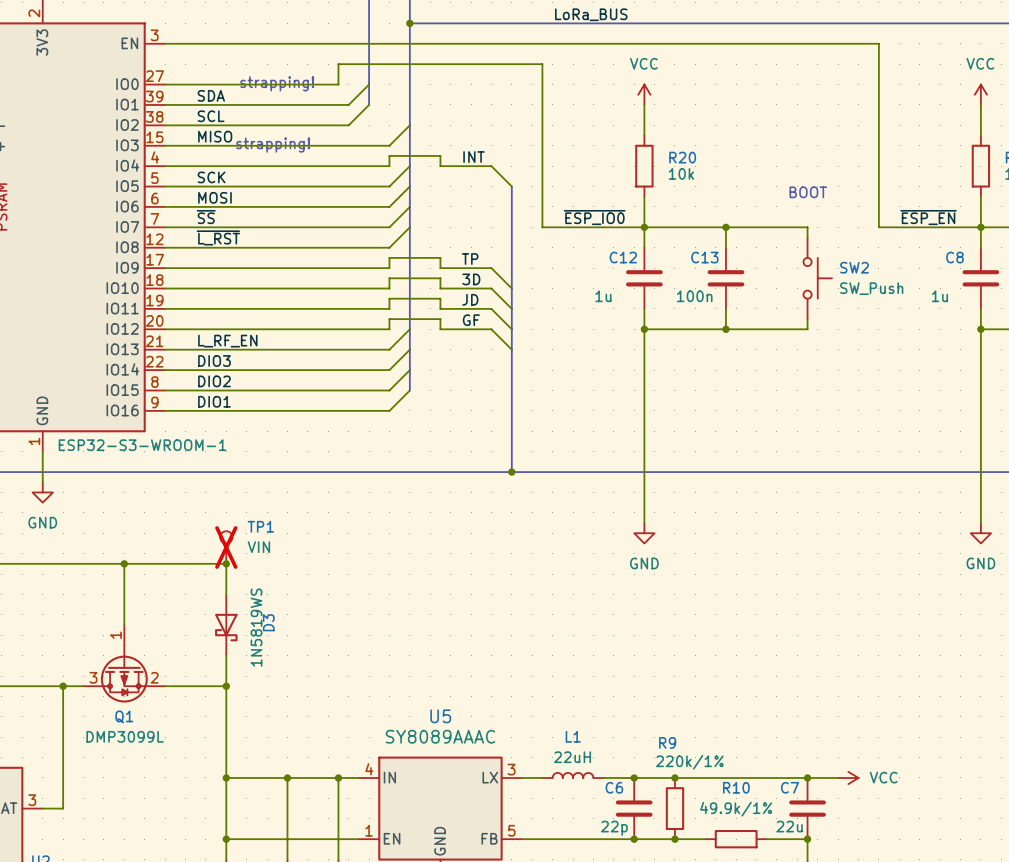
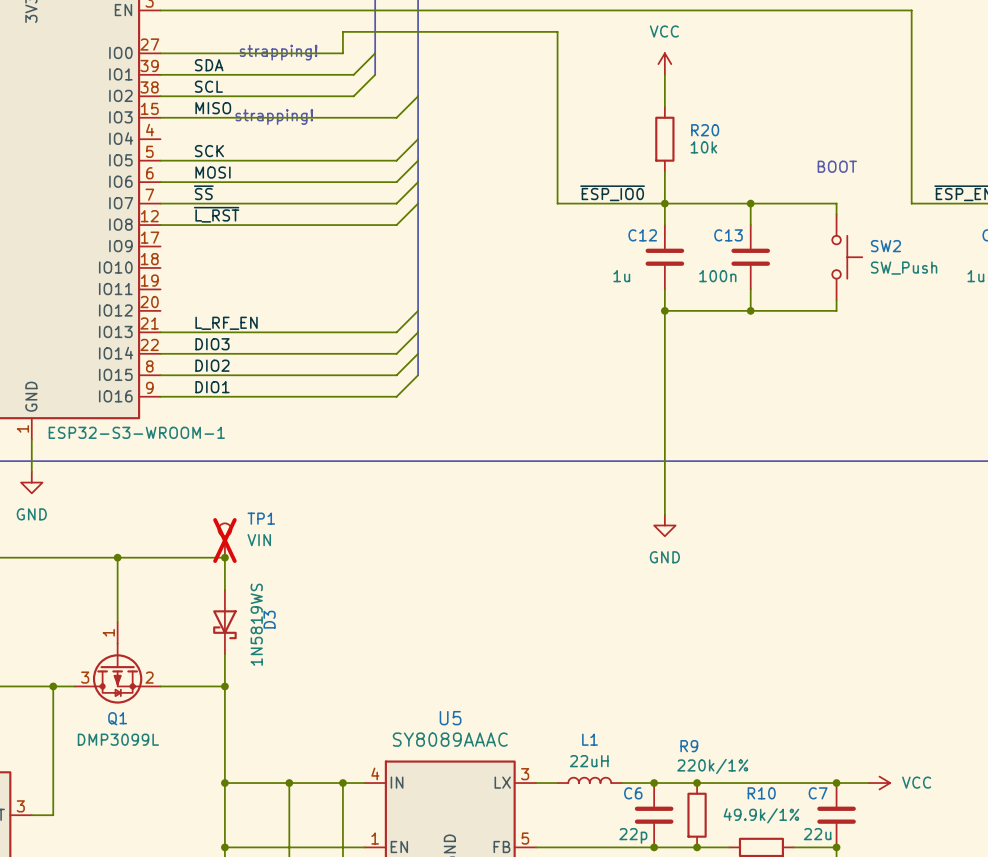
label: INT (474, 157) -> none
wire: (165, 166) (389, 166) (389, 155) (440, 155) (440, 166) (491, 166) (511, 186) -> none
bus: (511, 186) (511, 472) -> none
label: TP (470, 259) -> none
wire: (165, 268) (389, 268) (389, 257) (440, 257) (440, 268) (491, 268) (511, 288) -> none
label: 3D (471, 279) -> none
wire: (165, 288) (389, 288) (389, 278) (440, 278) (440, 288) (491, 288) (511, 308) -> none
label: JD (470, 299) -> none
wire: (165, 308) (389, 308) (389, 298) (440, 298) (440, 308) (491, 308) (511, 329) -> none
label: GF (471, 320) -> none
wire: (165, 329) (389, 329) (389, 319) (440, 319) (440, 329) (491, 329) (511, 349) -> none
junction: (511, 472) -> none

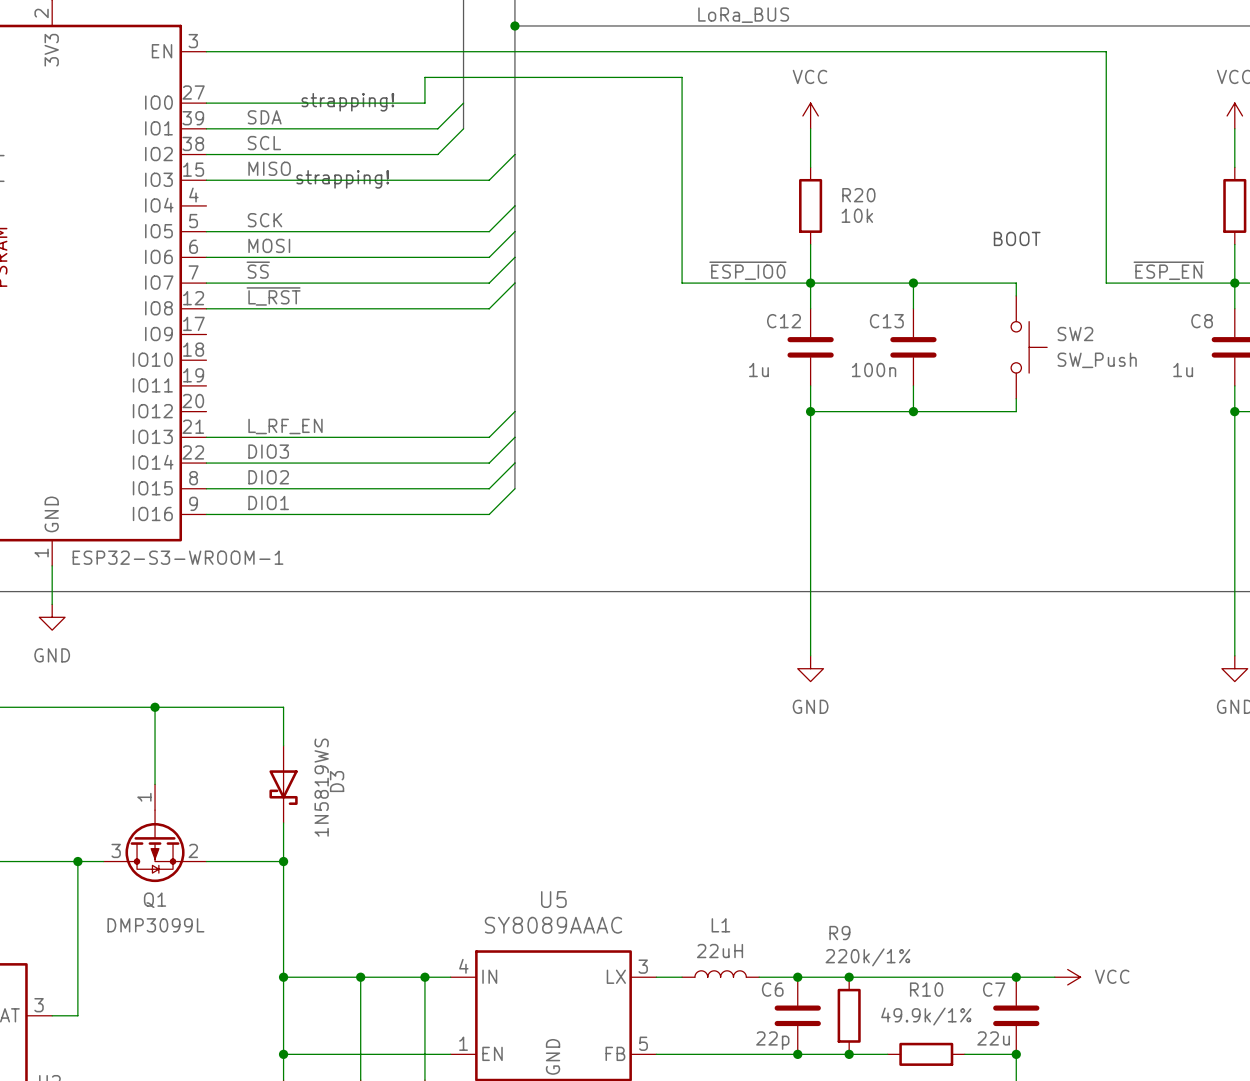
TP1: VIN (224, 540) -> none
junction: (224, 557) -> none

